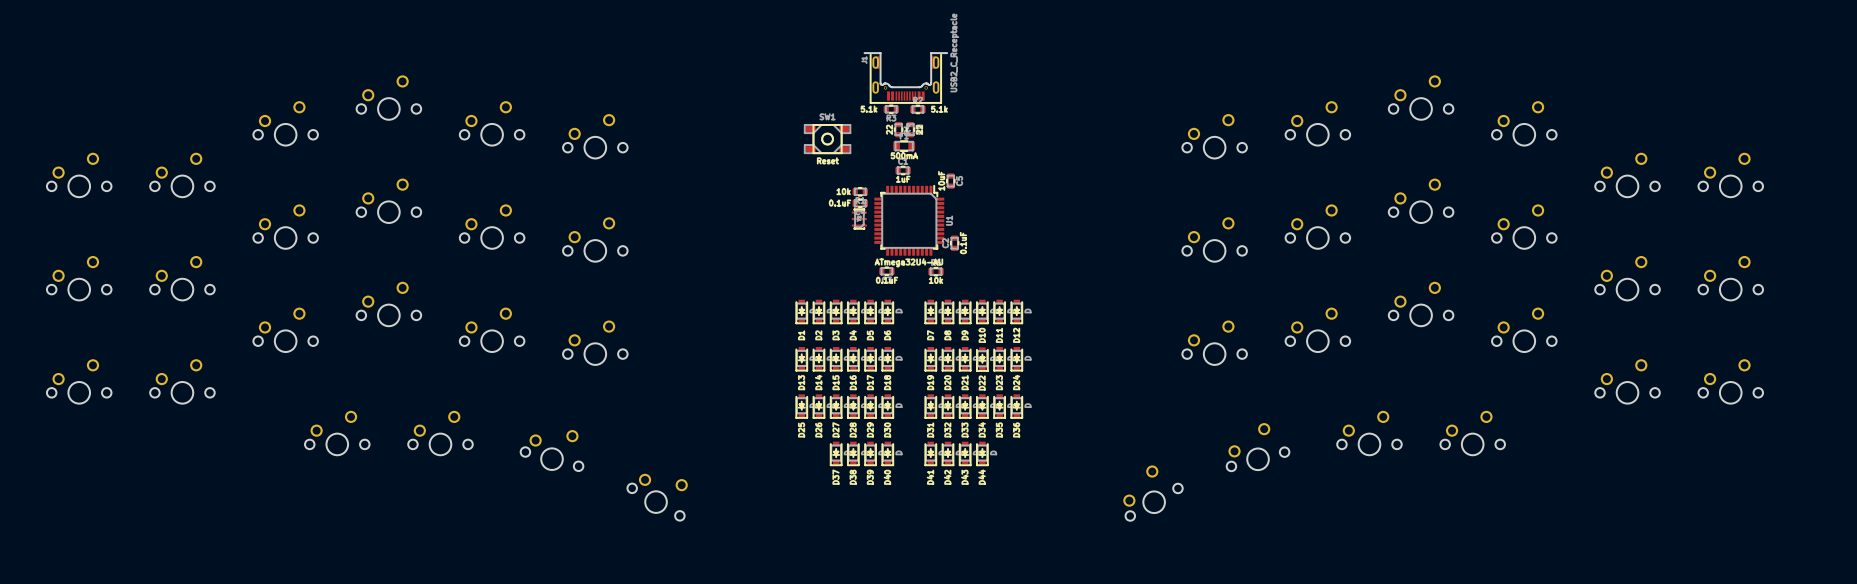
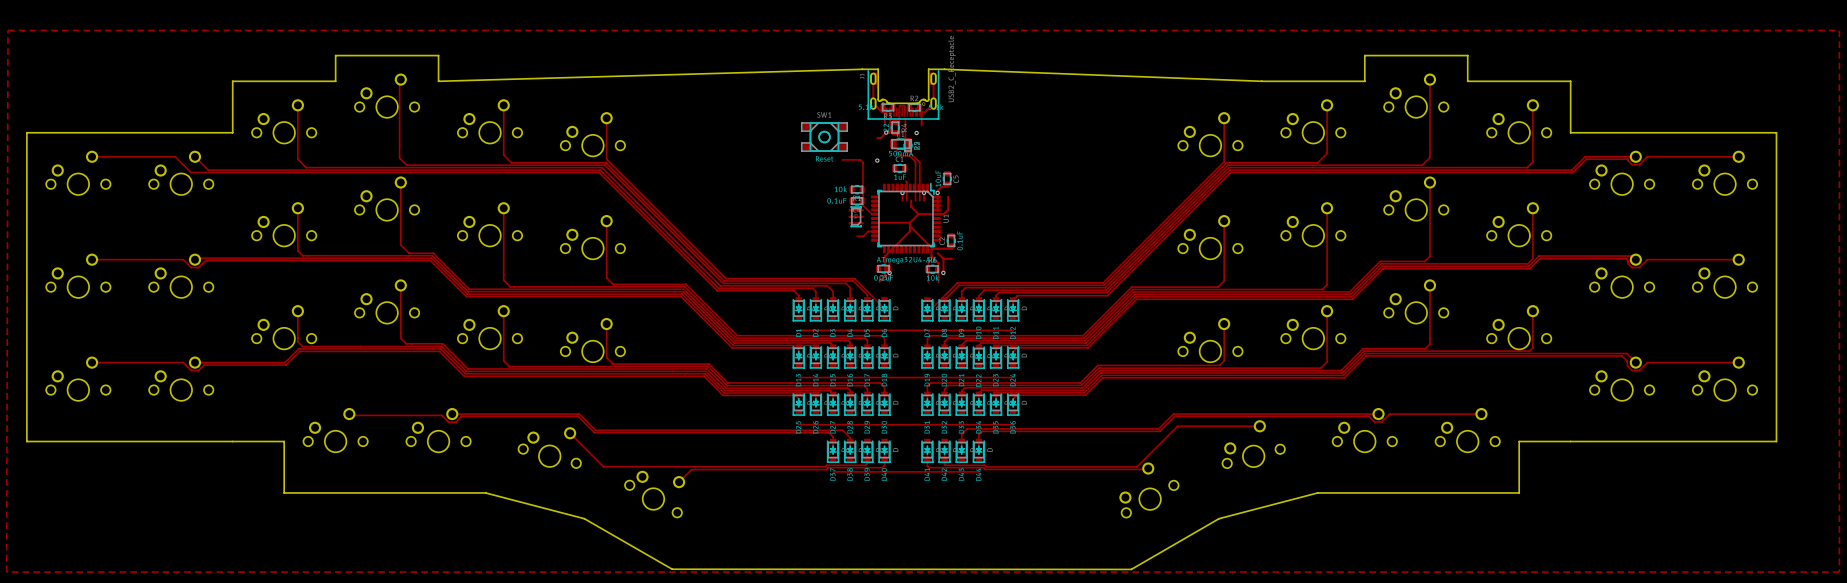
zone outline: none -> (8, 30) (6, 572) (1839, 572) (1839, 30) (8, 30)
board edge: none -> (862, 69) (438, 81) (438, 55) (335, 55) (335, 81) (232, 81) (232, 132) (26, 132) (26, 441) (284, 441) (284, 492) (485, 492) (584, 518) (672, 569) (1131, 569) (1219, 518) (1317, 492) (1519, 492) (1519, 441) (1776, 441) (1776, 132) (1570, 132) (1570, 81) (1467, 81) (1467, 55) (1364, 55) (1364, 81) (1261, 81) (944, 69)
part position: (905, 78) -> (903, 94)
track: none -> (873, 78) (873, 103) (881, 112) (886, 112) (884, 125)
track: none -> (933, 78) (933, 103) (925, 112) (920, 112) (921, 125)
track: none -> (400, 79) (399, 158) (406, 165) (604, 165) (722, 283) (845, 283) (850, 287) (850, 312)
track: none -> (1429, 79) (1429, 157) (1422, 165) (1227, 165) (1105, 287) (965, 287) (961, 291) (961, 312)
track: none -> (297, 105) (297, 159) (306, 167) (602, 167) (720, 285) (827, 285) (833, 291) (833, 312)
track: none -> (503, 105) (503, 155) (511, 162) (605, 162) (724, 280) (853, 280) (867, 294) (867, 312)
track: none -> (1327, 105) (1327, 153) (1317, 162) (1226, 162) (1104, 285) (959, 285) (944, 300) (944, 312)
track: none -> (1532, 105) (1532, 161) (1527, 167) (1228, 167) (1106, 290) (984, 290) (978, 295) (978, 312)
track: none -> (890, 112) (890, 131) (880, 138) (877, 138)
track: none -> (899, 112) (899, 137) (896, 140)
track: none -> (899, 112) (899, 105) (904, 106) (904, 112)
track: none -> (606, 118) (606, 159) (725, 278) (854, 278) (884, 308) (884, 312)
track: none -> (905, 118) (905, 137) (908, 140)
track: none -> (1224, 118) (1224, 161) (1103, 282) (957, 282) (927, 312)
part position: (910, 129) -> (908, 145)
via: none -> (886, 132)
via: none -> (916, 132)
track: none -> (896, 150) (901, 155) (909, 155) (915, 161) (915, 200)
track: none -> (908, 150) (919, 162) (919, 200)
track: none -> (92, 156) (175, 156) (190, 172) (599, 172) (717, 290) (793, 290) (798, 295) (798, 312)
track: none -> (194, 156) (208, 170) (600, 170) (718, 288) (812, 288) (815, 291) (815, 312)
track: none -> (1635, 156) (1585, 156) (1571, 170) (1229, 170) (1107, 292) (999, 292) (996, 295) (996, 312)
track: none -> (1738, 156) (1647, 156) (1639, 164) (1632, 164) (1627, 159) (1586, 159) (1573, 172) (1230, 172) (1107, 295) (1017, 295) (1013, 300) (1013, 312)
track: none -> (842, 159) (860, 159) (863, 162) (863, 205) (871, 214) (876, 214)
via: none -> (877, 160)
track: none -> (905, 181) (906, 200)
track: none -> (400, 182) (400, 245) (409, 253) (433, 253) (469, 289) (684, 289) (735, 340) (848, 340) (850, 342) (850, 359)
track: none -> (1429, 182) (1429, 256) (1424, 261) (1380, 261) (1349, 291) (1133, 291) (1085, 340) (966, 340) (961, 345) (961, 359)
track: none -> (948, 186) (941, 186) (937, 190) (937, 209)
track: none -> (902, 192) (902, 200)
via: none -> (902, 192)
track: none -> (924, 192) (924, 200)
via: none -> (924, 192)
via: none -> (937, 192)
track: none -> (948, 196) (948, 209) (943, 214) (918, 214)
track: none -> (911, 200) (911, 206) (918, 214)
track: none -> (297, 208) (297, 250) (302, 255) (432, 255) (468, 291) (682, 291) (734, 343) (830, 343) (833, 345) (833, 359)
track: none -> (503, 208) (503, 280) (510, 286) (685, 286) (736, 338) (865, 338) (867, 340) (867, 359)
track: none -> (1327, 208) (1327, 284) (1322, 289) (1132, 289) (1084, 338) (948, 338) (944, 341) (944, 359)
track: none -> (1532, 208) (1532, 258) (1527, 263) (1381, 263) (1350, 294) (1134, 294) (1086, 343) (981, 343) (978, 345) (978, 360)
track: none -> (918, 214) (909, 222)
track: none -> (606, 221) (606, 277) (613, 284) (686, 284) (737, 335) (881, 335) (884, 338) (884, 359)
track: none -> (1224, 221) (1224, 281) (1218, 287) (1131, 287) (1083, 335) (930, 335) (927, 338) (927, 359)
track: none -> (876, 222) (909, 222)
track: none -> (909, 222) (909, 231) (885, 256) (885, 275) (879, 281)
track: none -> (909, 225) (932, 248)
track: none -> (876, 231) (868, 231) (863, 236) (857, 236)
track: none -> (932, 248) (931, 256) (938, 263) (938, 282)
track: none -> (932, 248) (952, 248)
track: none -> (937, 253) (943, 258)
track: none -> (943, 258) (943, 272)
track: none -> (943, 258) (952, 258)
track: none -> (92, 259) (183, 259) (191, 267) (198, 267) (205, 260) (430, 260) (466, 296) (680, 296) (732, 347) (796, 347) (798, 349) (798, 359)
track: none -> (194, 259) (431, 258) (467, 294) (681, 294) (733, 345) (814, 345) (815, 359)
track: none -> (1635, 259) (1632, 256) (1539, 256) (1528, 266) (1382, 266) (1351, 296) (1135, 296) (1087, 345) (999, 345) (996, 348) (996, 359)
track: none -> (1738, 259) (1647, 259) (1639, 267) (1632, 267) (1626, 258) (1540, 258) (1529, 268) (1383, 268) (1352, 299) (1136, 299) (1088, 347) (1016, 347) (1013, 351) (1013, 359)
track: none -> (889, 262) (889, 281)
track: none -> (928, 262) (928, 282)
via: none -> (889, 272)
via: none -> (943, 272)
track: none -> (400, 285) (400, 338) (406, 343) (442, 343) (468, 368) (706, 368) (726, 388) (847, 388) (850, 390) (850, 406)
track: none -> (1429, 285) (1429, 344) (1425, 348) (1363, 348) (1341, 370) (1099, 370) (1082, 387) (964, 387) (961, 390) (961, 406)
track: none -> (297, 311) (297, 341) (302, 346) (441, 346) (466, 371) (705, 371) (725, 390) (829, 390) (833, 393) (833, 406)
track: none -> (503, 311) (503, 360) (509, 366) (707, 366) (727, 385) (864, 385) (867, 388) (867, 406)
track: none -> (1327, 311) (1327, 361) (1320, 368) (1098, 368) (1081, 385) (948, 385) (944, 389) (944, 406)
track: none -> (1532, 311) (1532, 347) (1529, 351) (1364, 351) (1342, 373) (1100, 373) (1083, 390) (981, 390) (978, 393) (978, 406)
track: none -> (606, 324) (606, 357) (613, 364) (708, 364) (727, 383) (880, 383) (884, 387) (884, 406)
track: none -> (1224, 324) (1224, 360) (1219, 365) (1097, 365) (1080, 383) (930, 383) (927, 386) (927, 406)
track: none -> (798, 330) (1013, 330)
track: none -> (92, 362) (183, 362) (191, 370) (198, 370) (201, 368)
track: none -> (194, 362) (285, 362) (298, 348) (440, 348) (465, 373) (704, 373) (724, 392) (814, 392) (815, 406)
track: none -> (1635, 362) (1626, 353) (1365, 353) (1343, 375) (1101, 375) (1084, 392) (999, 392) (996, 395) (996, 406)
track: none -> (1738, 362) (1647, 362) (1639, 370) (1632, 370) (1622, 355) (1366, 355) (1344, 377) (1102, 377) (1085, 395) (1016, 395) (1013, 398) (1013, 406)
track: none -> (201, 368) (204, 365) (286, 365) (299, 351) (439, 351) (464, 376) (703, 376) (723, 395) (795, 395) (798, 398) (798, 406)
track: none -> (798, 377) (1013, 377)
track: none -> (349, 414) (442, 415) (448, 422) (455, 422) (461, 416) (578, 416) (594, 432) (828, 432) (833, 436) (833, 454)
track: none -> (452, 414) (579, 414) (595, 430) (842, 430) (850, 437) (850, 454)
track: none -> (1378, 414) (1173, 414) (1158, 428) (966, 428) (961, 434) (961, 454)
track: none -> (1481, 414) (1389, 414) (1381, 421) (1374, 421) (1369, 416) (1174, 416) (1159, 431) (982, 431) (978, 434) (978, 454)
track: none -> (798, 424) (1013, 424)
track: none -> (1259, 426) (1177, 426) (1136, 467) (945, 465) (944, 454)
track: none -> (570, 433) (603, 466) (865, 465) (867, 454)
track: none -> (884, 454) (884, 465) (882, 467) (691, 469) (679, 482)
track: none -> (927, 454) (928, 467) (983, 467) (985, 469) (1148, 468)
track: none -> (833, 471) (978, 471)

